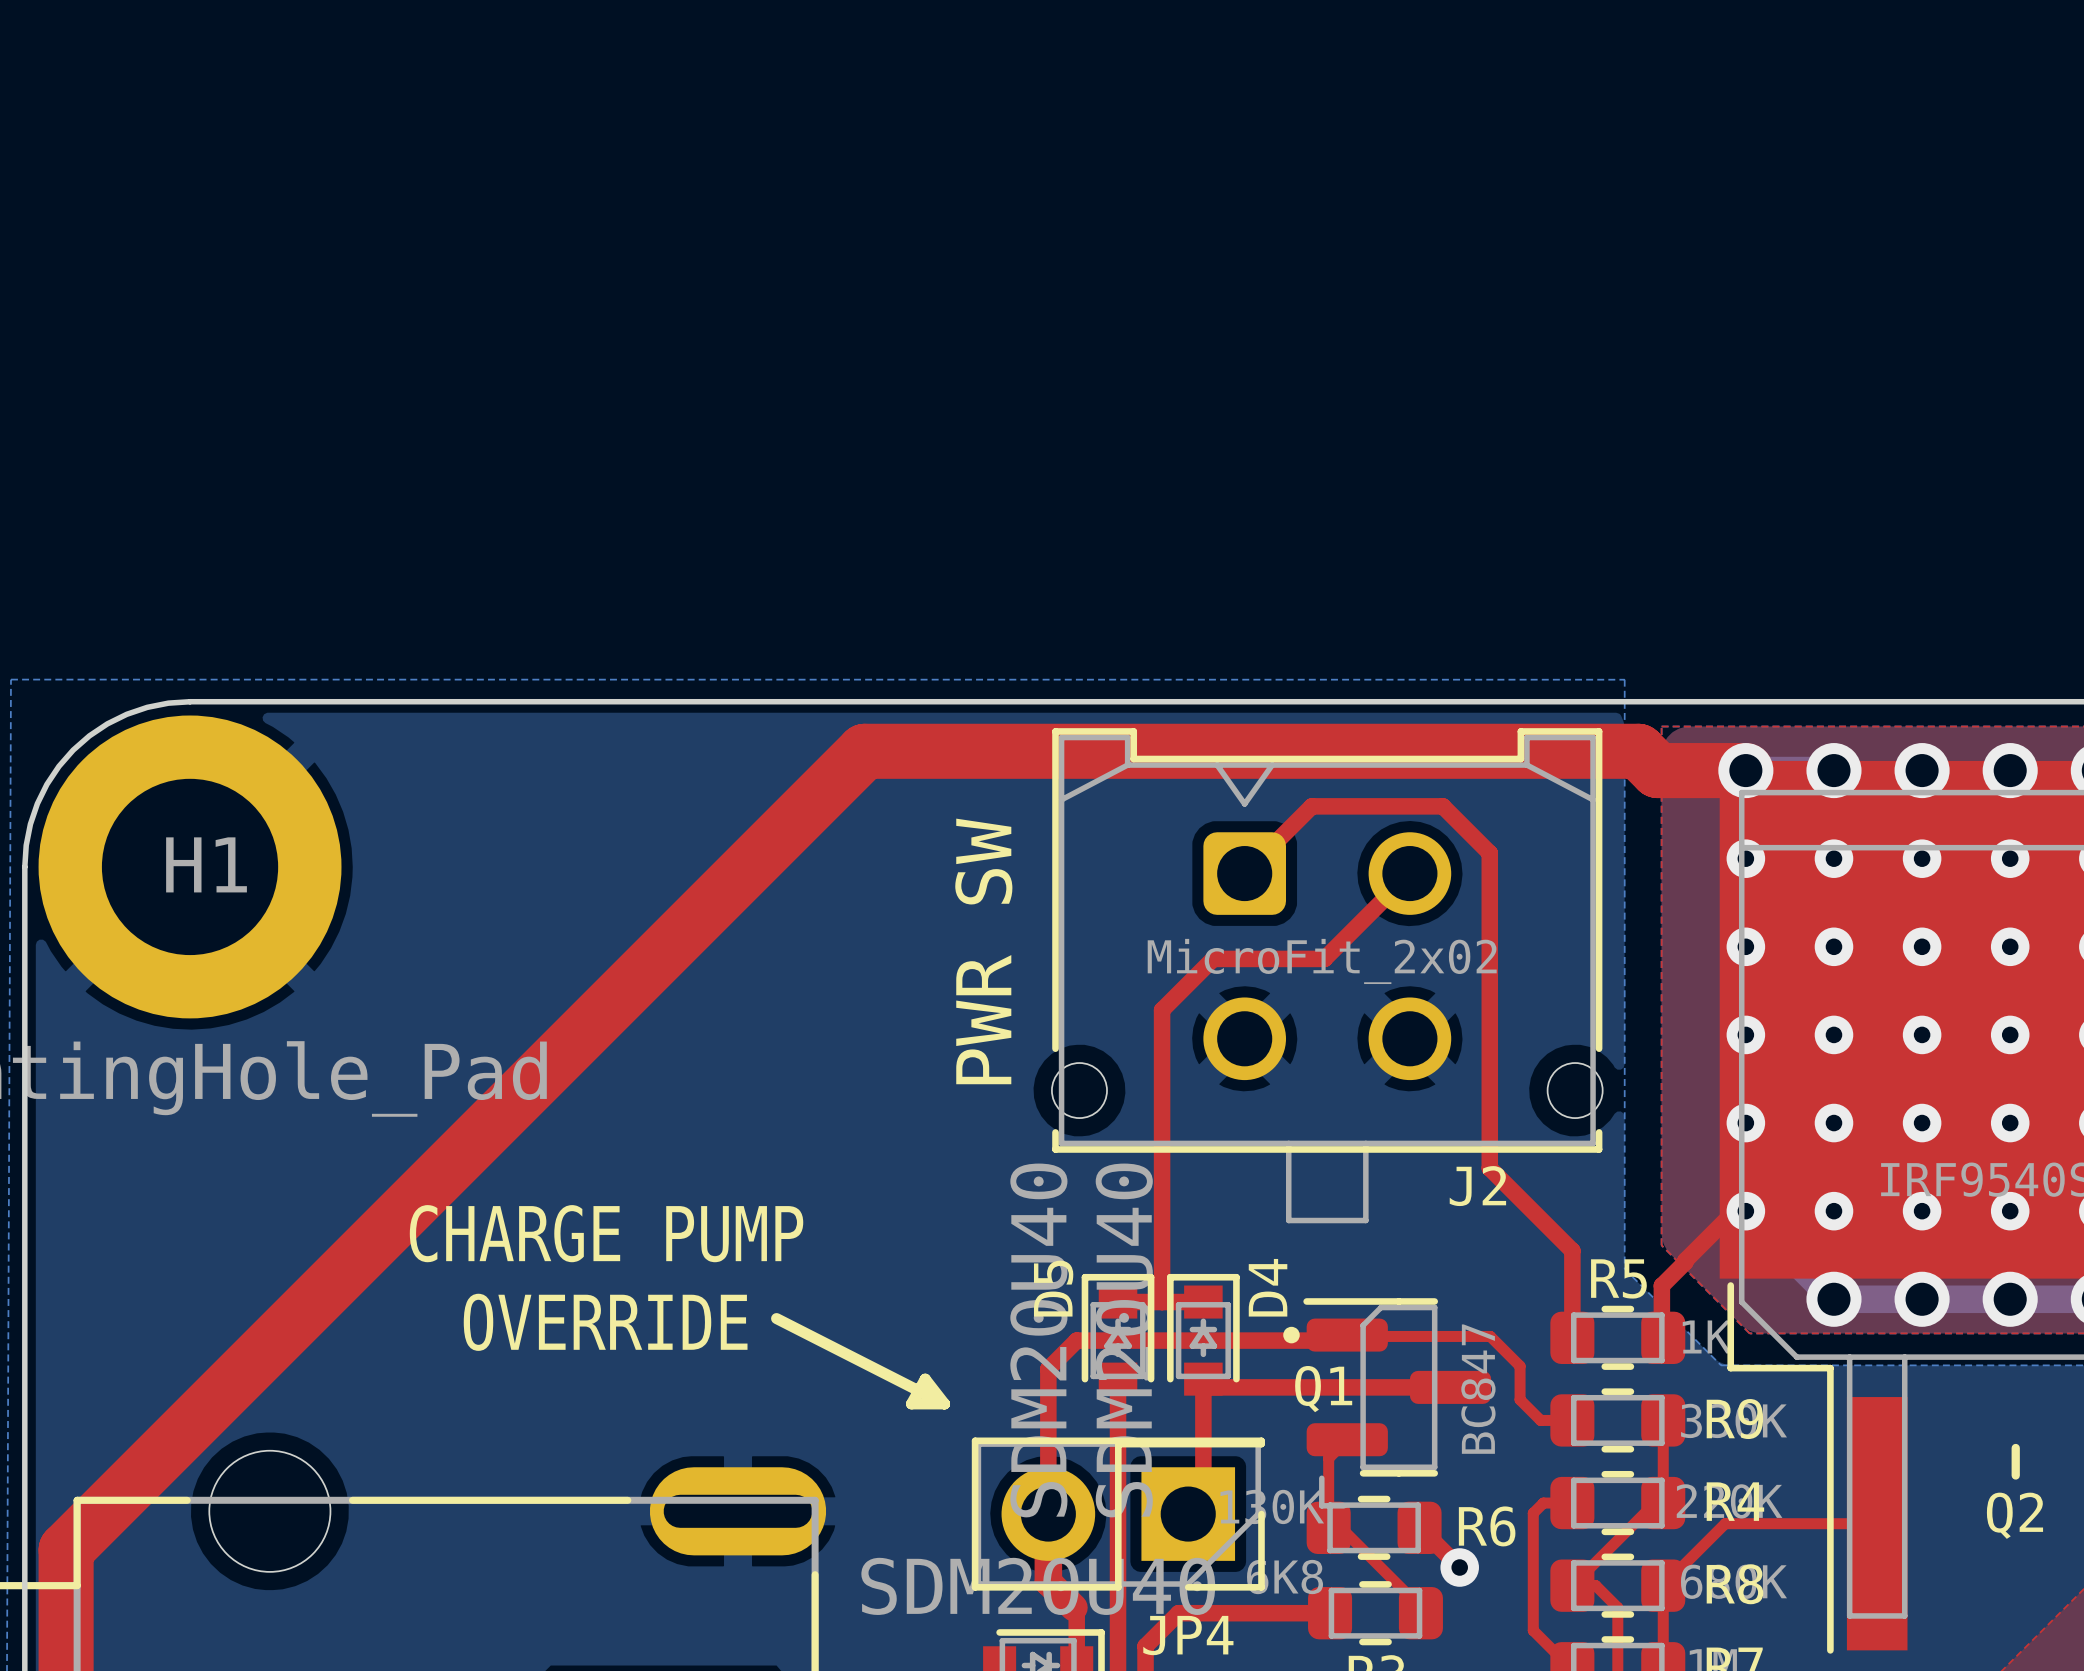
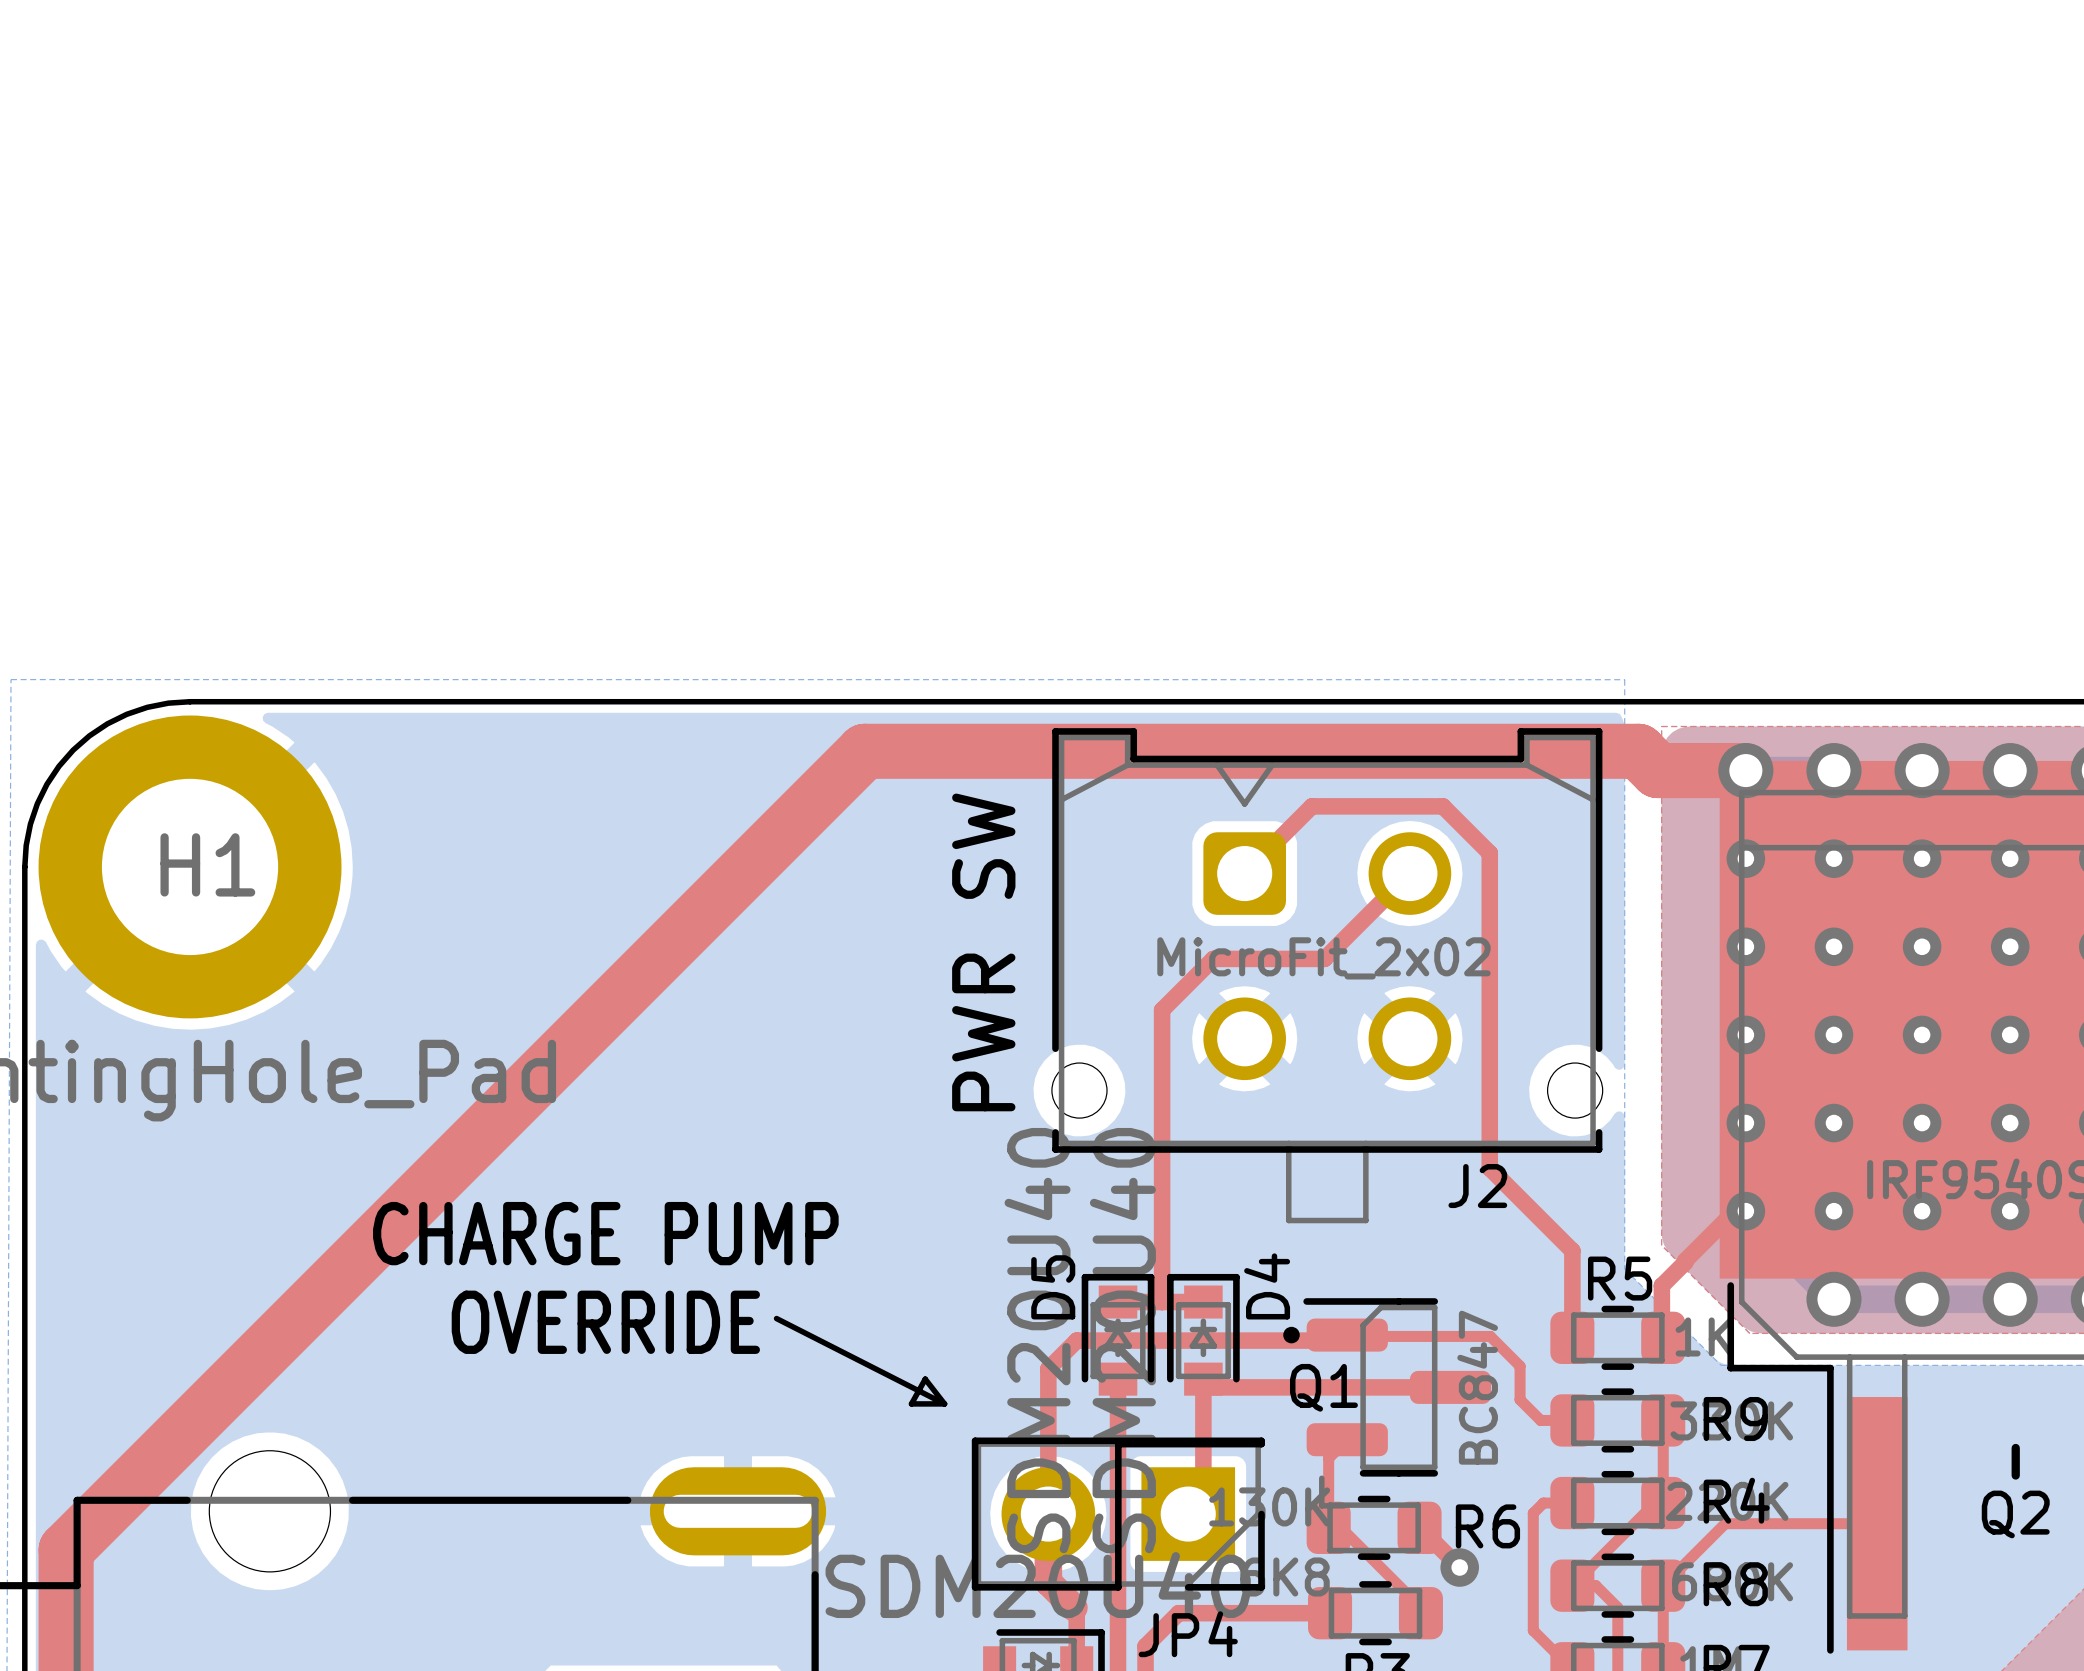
line width: thick (776, 1318) (944, 1403) -> thin (776, 1318) (944, 1403)
line width: thick (944, 1403) (911, 1403) (925, 1379) (944, 1403) -> thin (944, 1403) (911, 1403) (925, 1379) (944, 1403)

